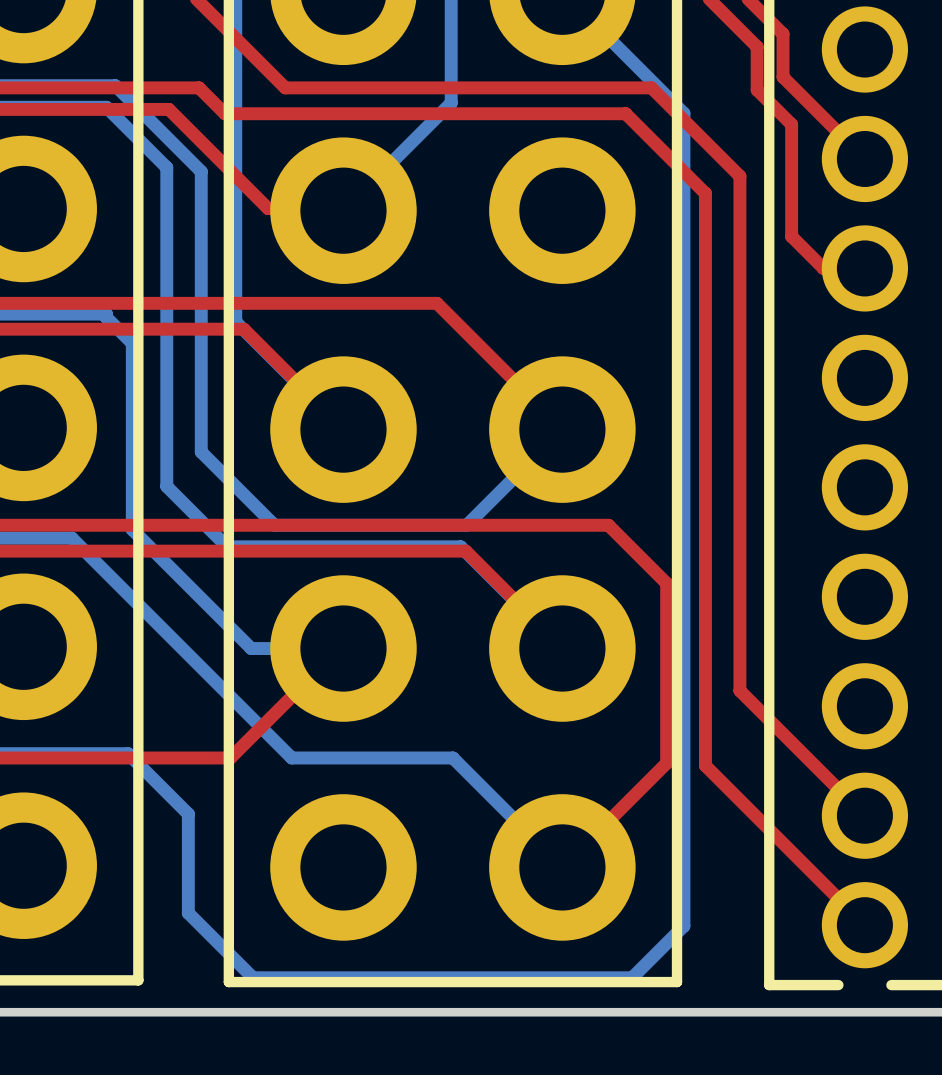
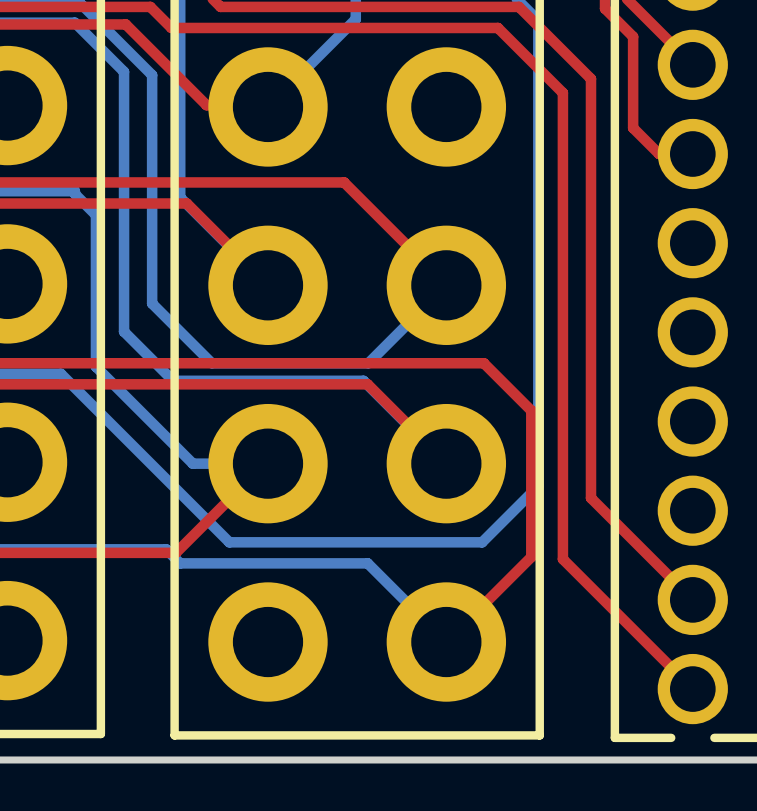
bottom track: (675, 104) (683, 113) (683, 926) (632, 977) (252, 977) (188, 913) (188, 814) (128, 753) -> (538, 20) (538, 486) (482, 542) (229, 542) (60, 373) (46, 373)
bottom track: (71, 538) (291, 757) (452, 757) (465, 770) -> (92, 549) (166, 549) (180, 563) (367, 563)

